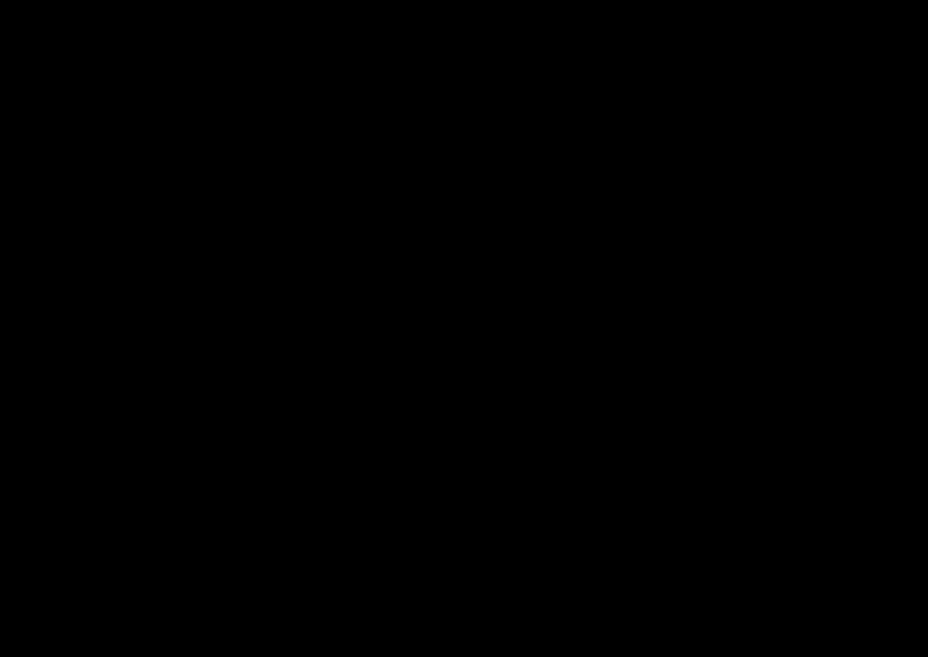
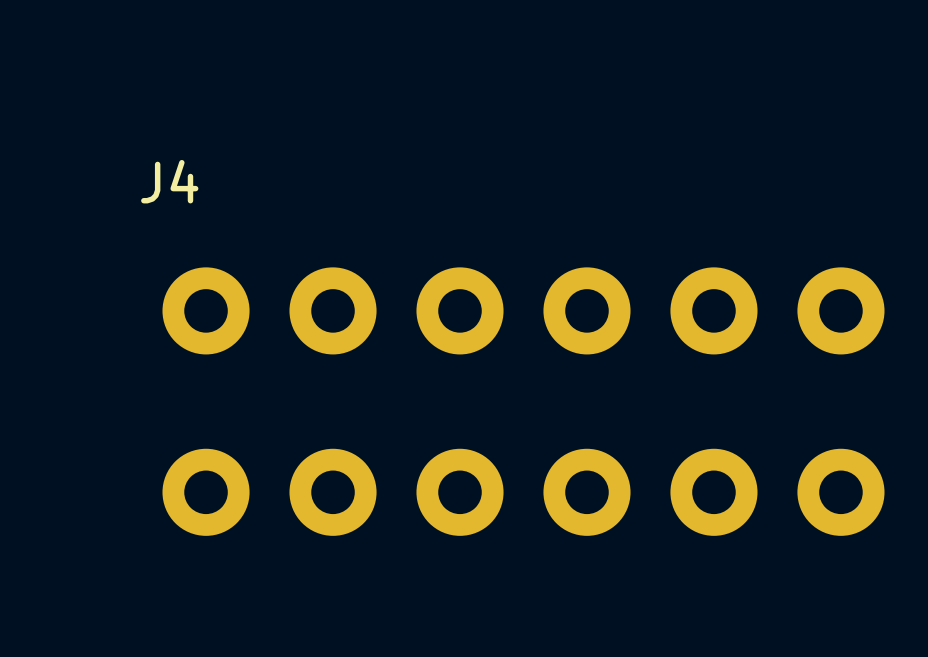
J4: none -> (523, 401)

